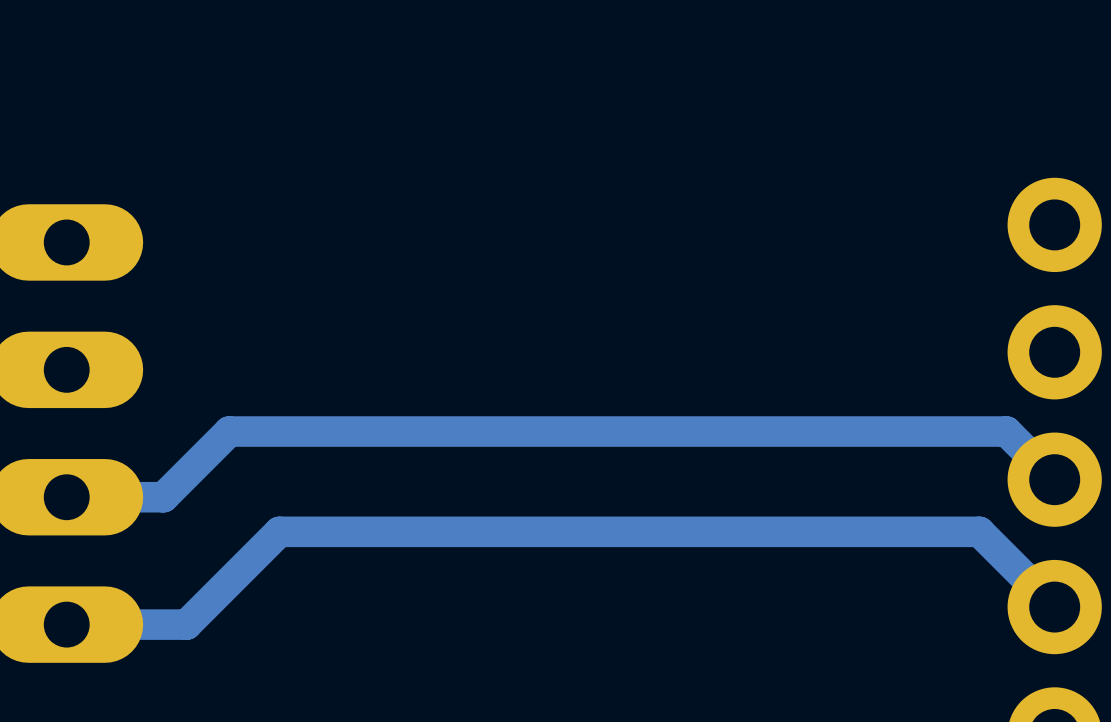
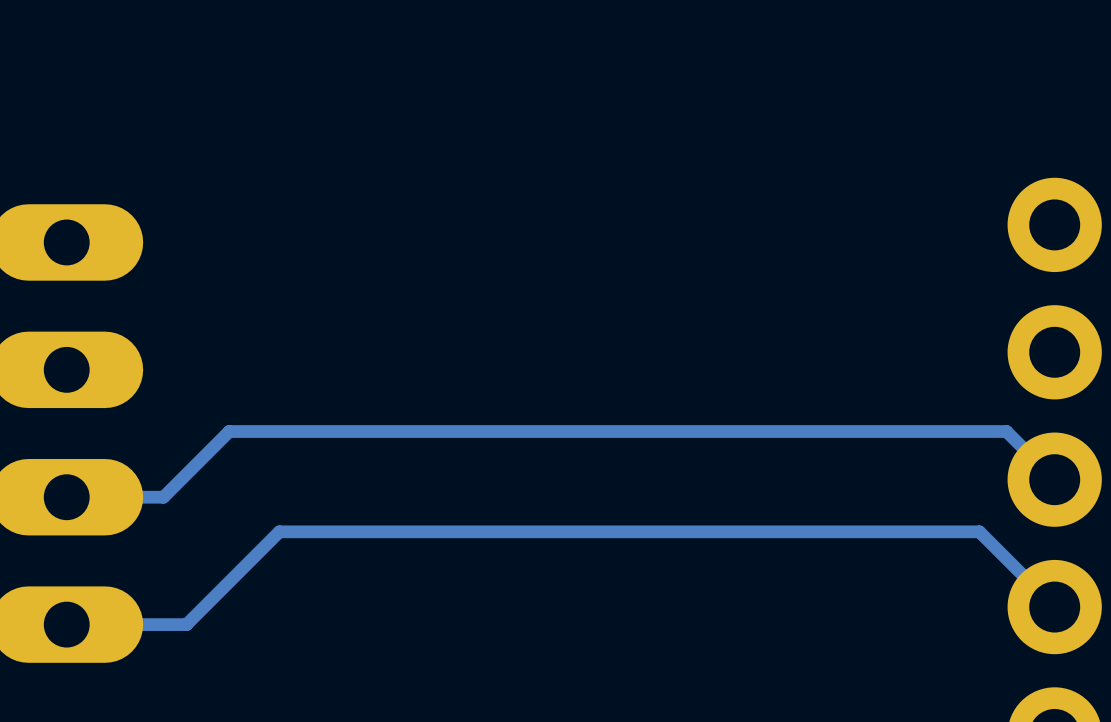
track width: thick (1054, 479) (1006, 431) (229, 431) (163, 497) (66, 497) -> thin (1054, 479) (1006, 431) (229, 431) (163, 497) (66, 497)
track width: thick (1054, 607) (979, 531) (279, 531) (186, 624) (66, 624) -> thin (1054, 607) (979, 531) (279, 531) (186, 624) (66, 624)

